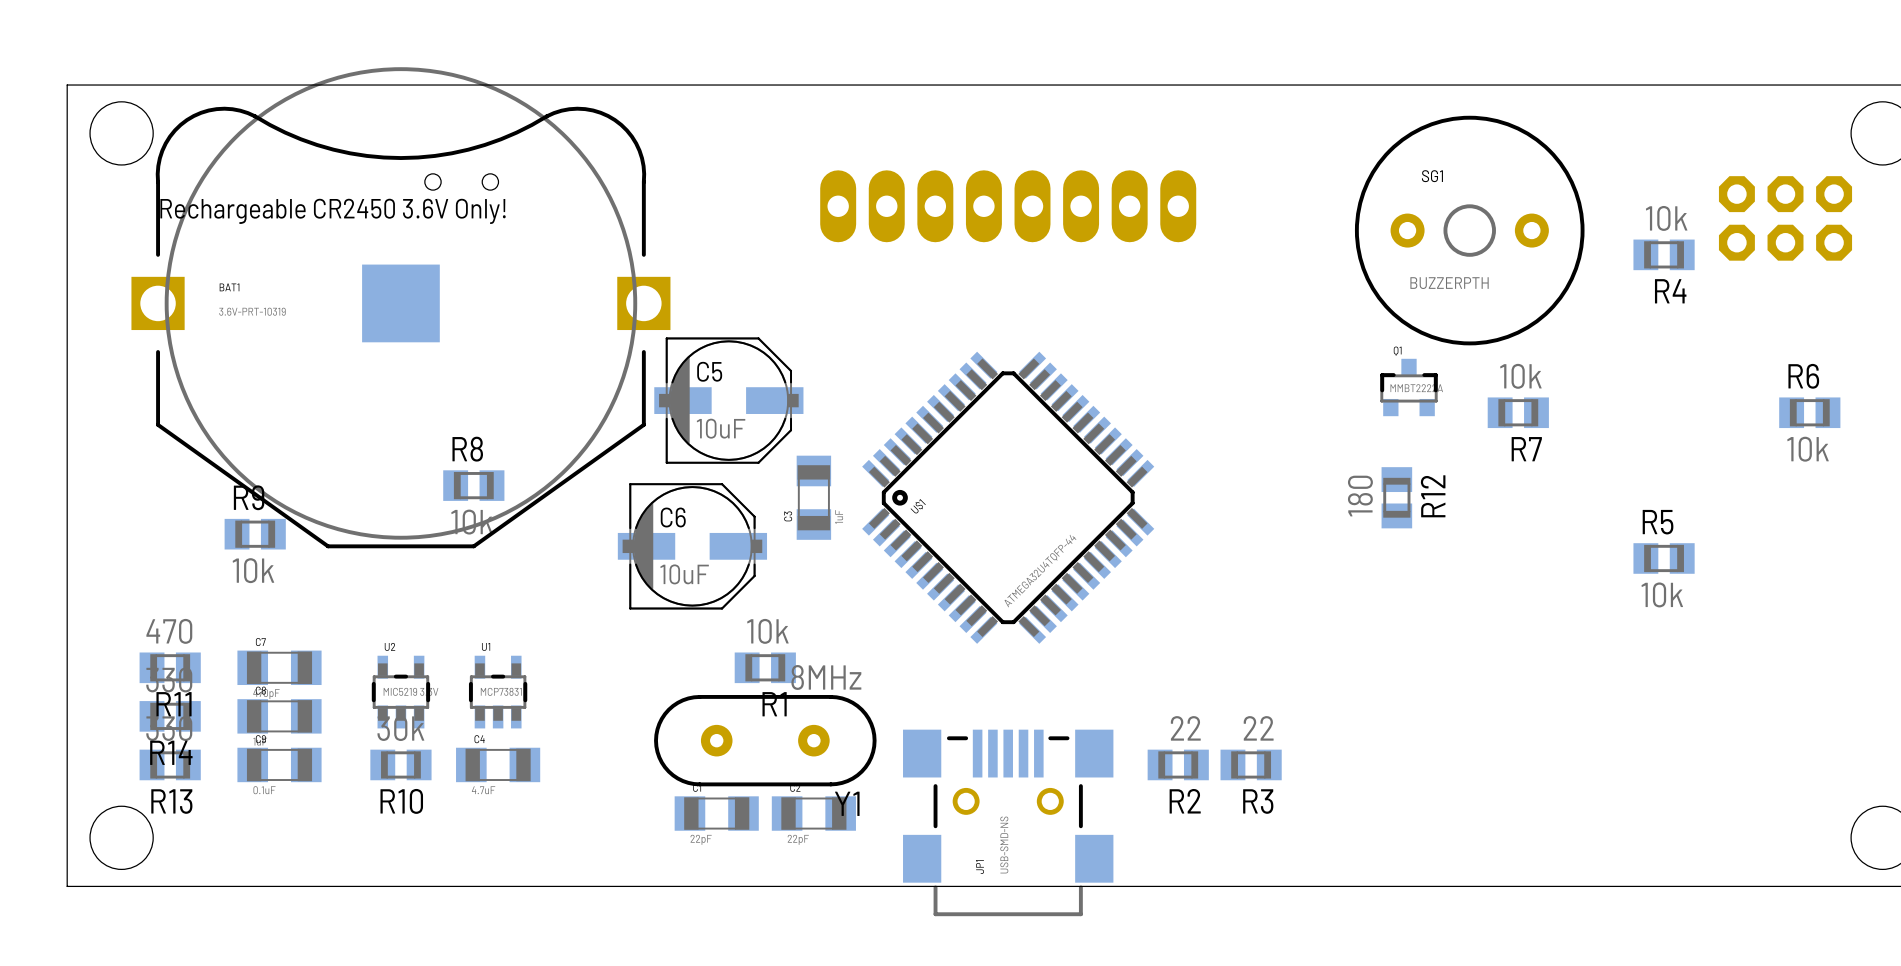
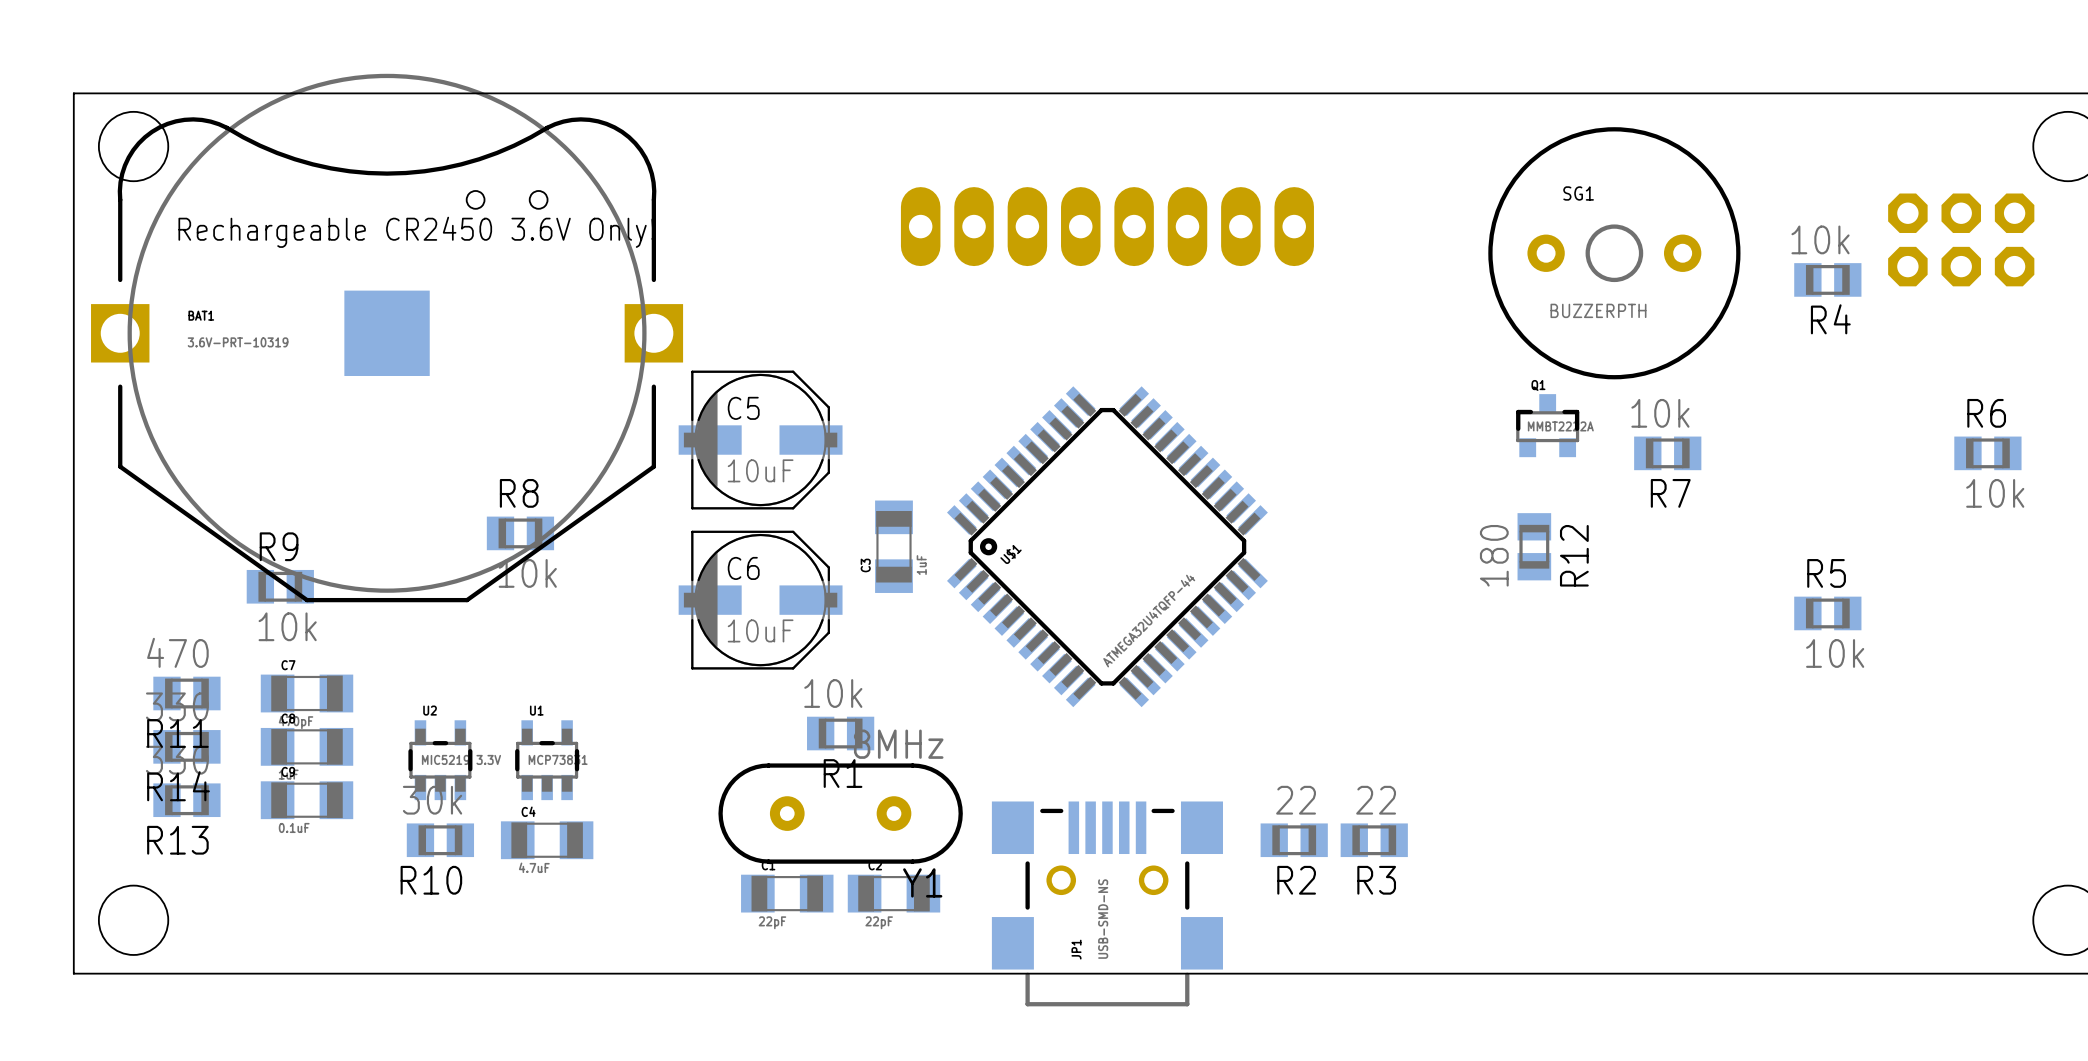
BAT1 position: (400, 307) -> (387, 338)
C5 position: (728, 400) -> (760, 440)
R11 position: (170, 667) -> (186, 693)
C7 position: (279, 667) -> (307, 693)
R14 position: (170, 716) -> (186, 746)
C8 position: (279, 716) -> (307, 746)
R13 position: (170, 764) -> (186, 800)
C9 position: (279, 764) -> (307, 800)

